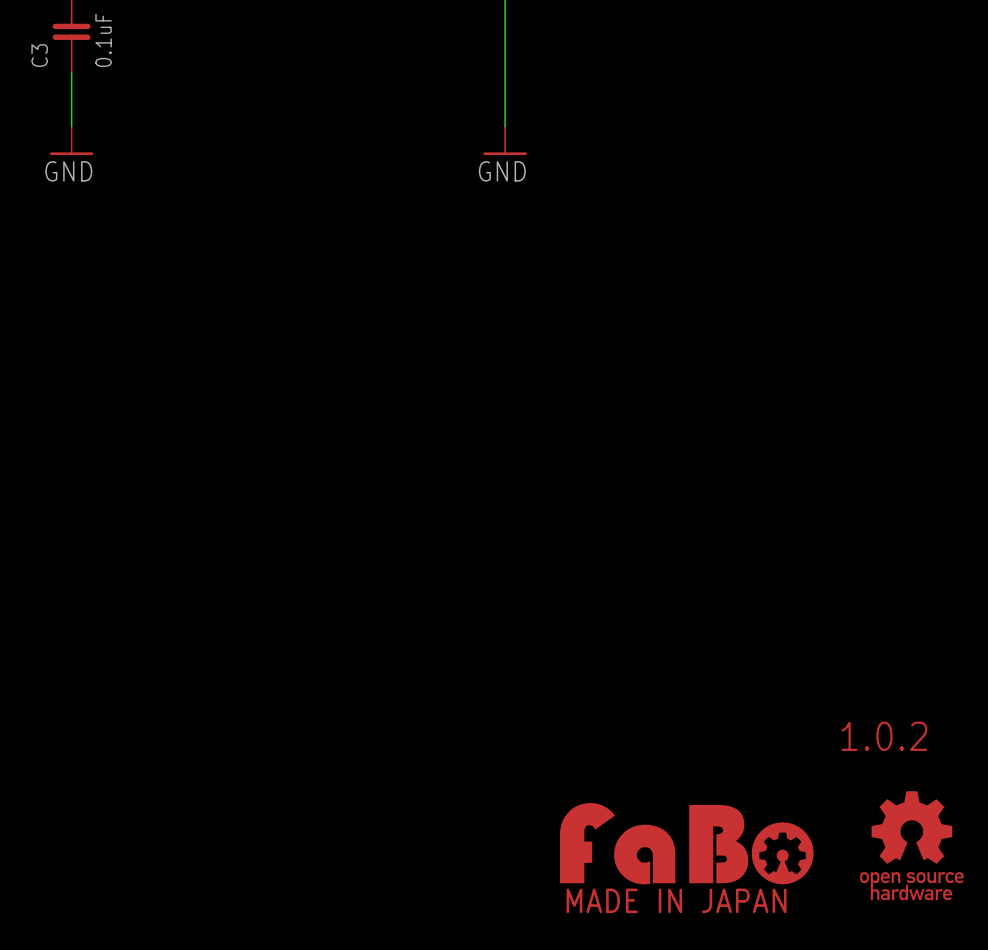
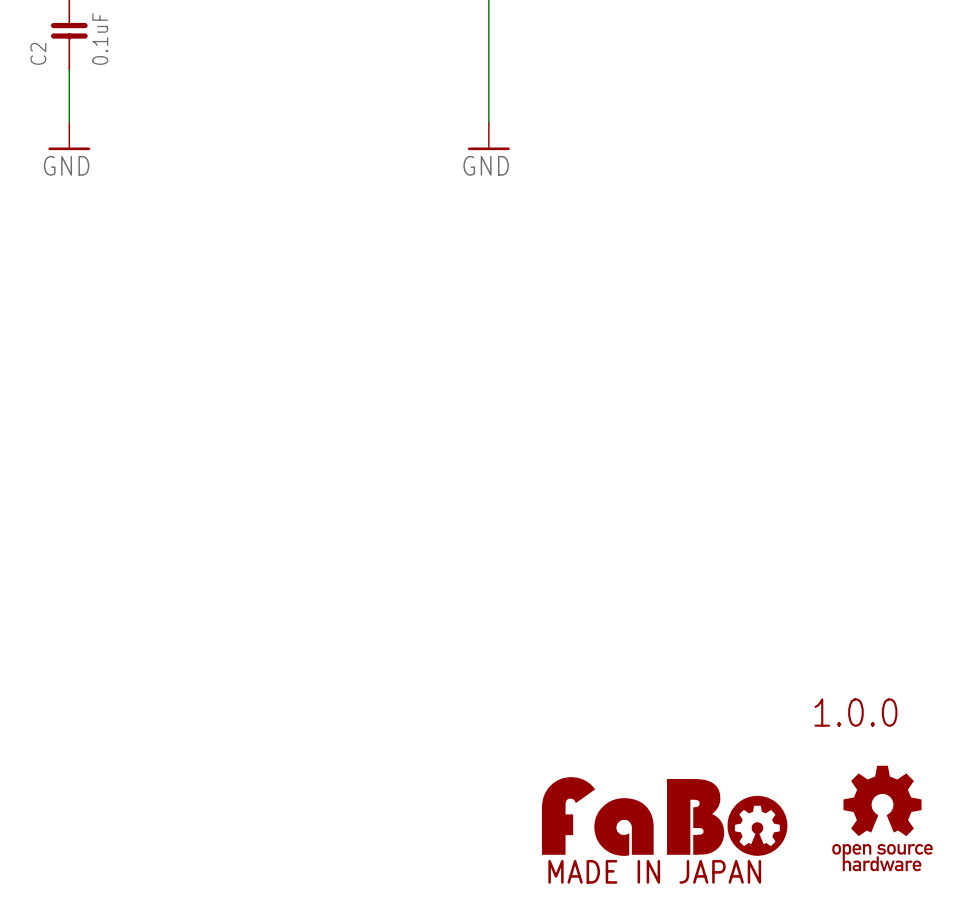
C3 name: C3 (39, 55) -> C2 (38, 53)
text: 1.0.2 (884, 736) -> 1.0.0 (855, 712)

